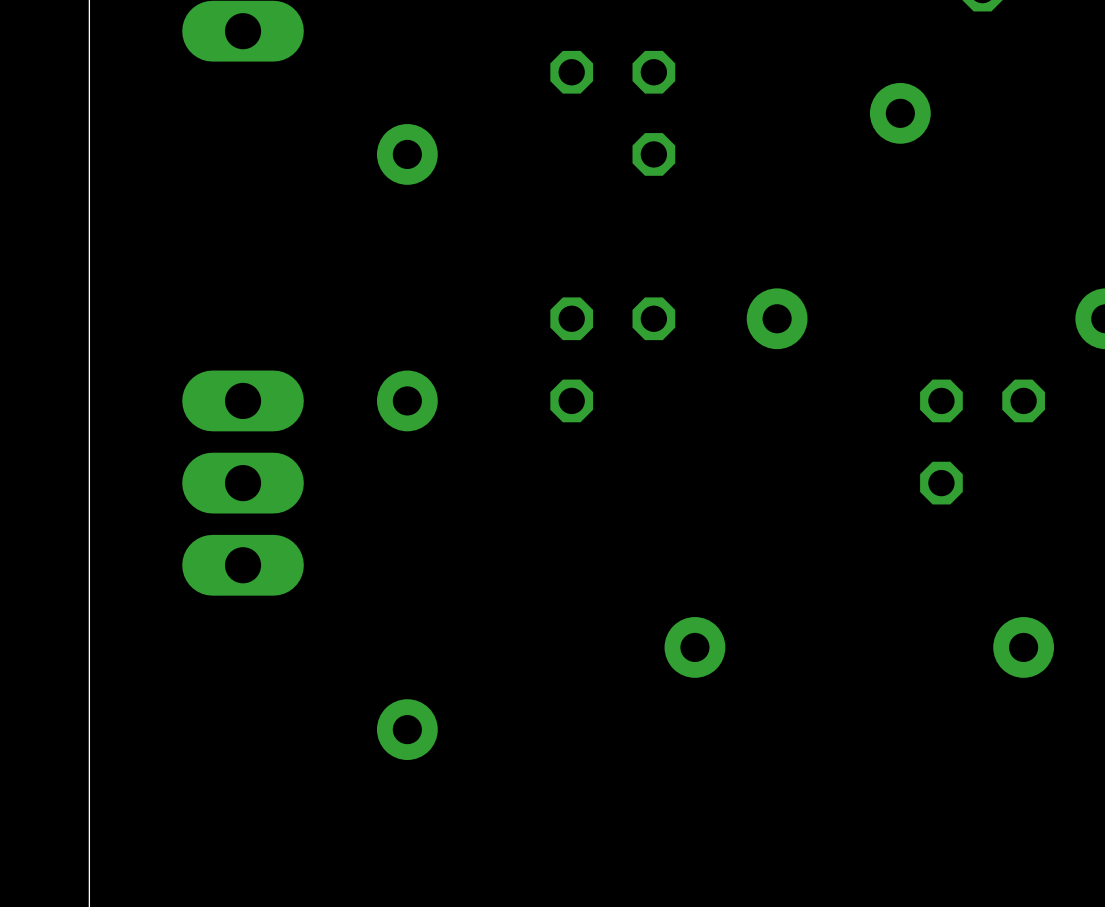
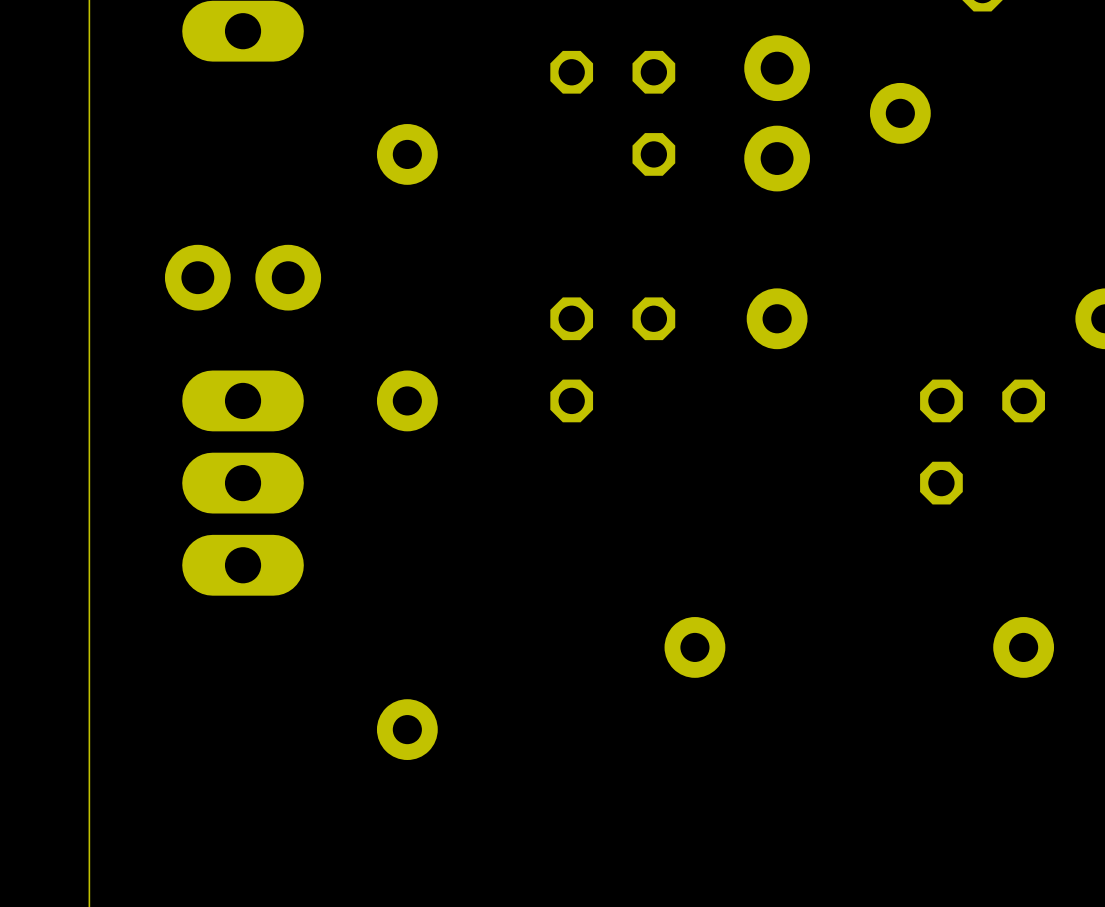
part: none -> (777, 113)
part: none -> (243, 277)

